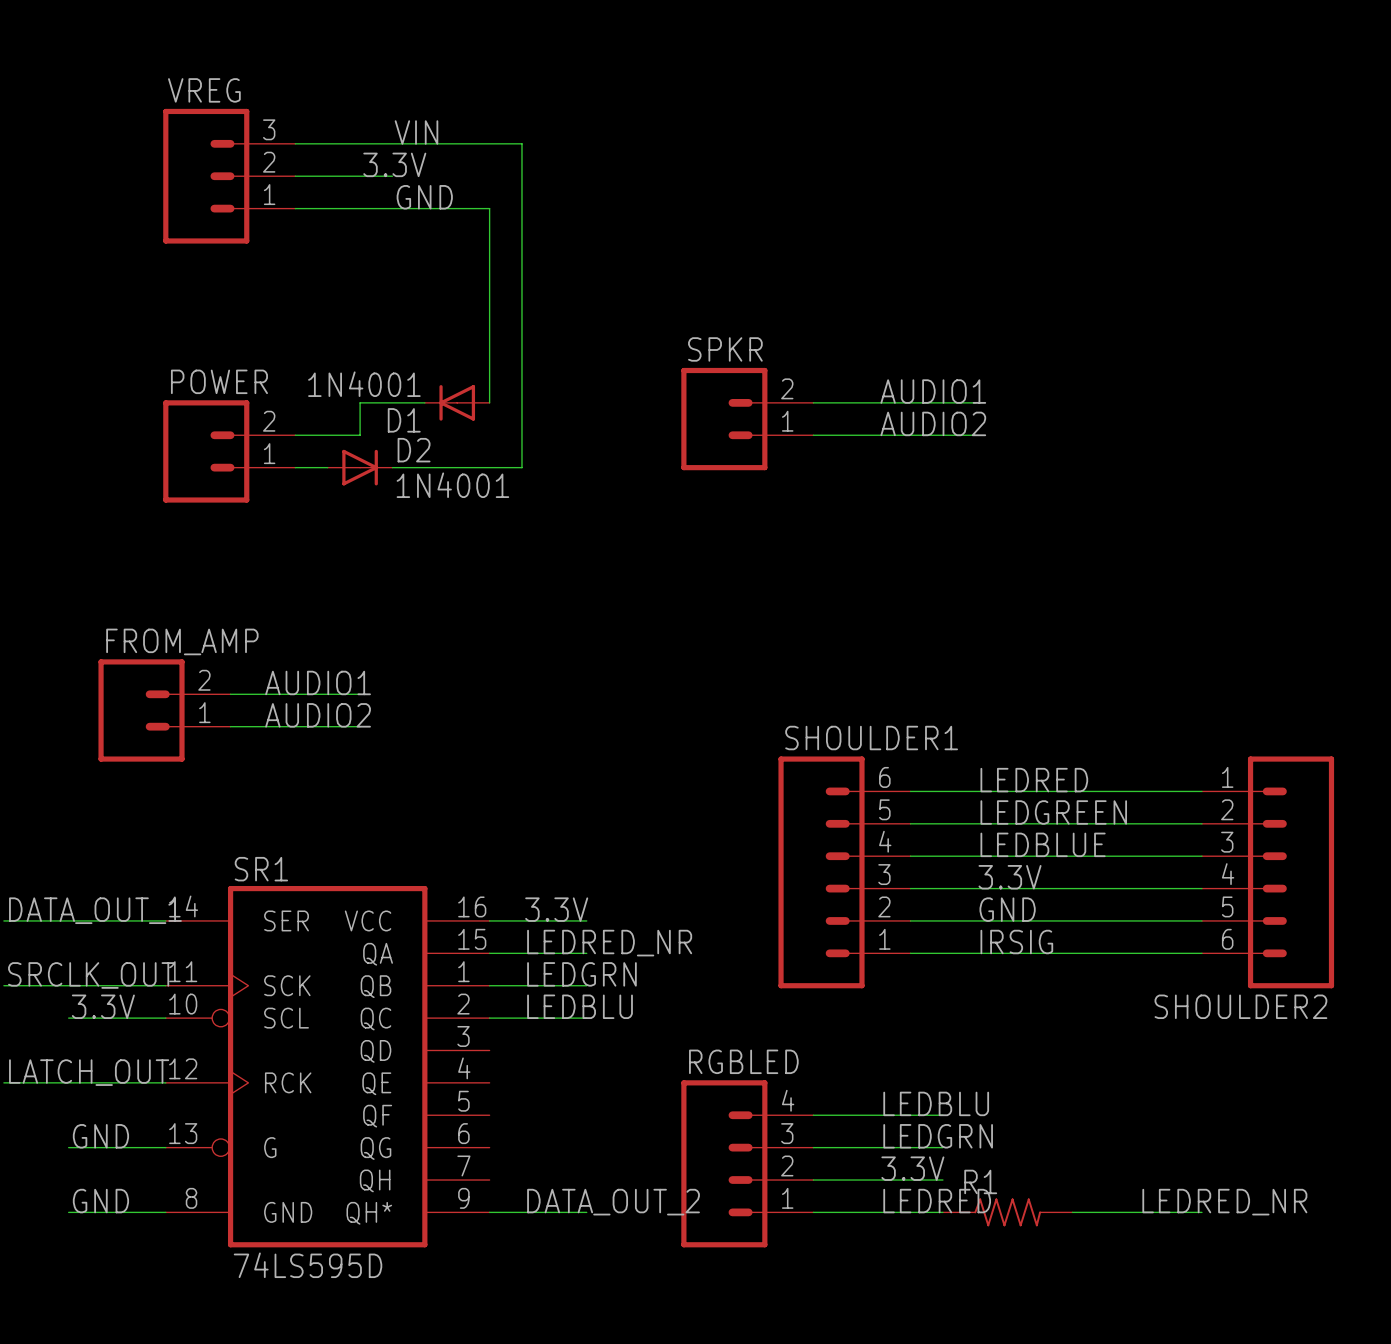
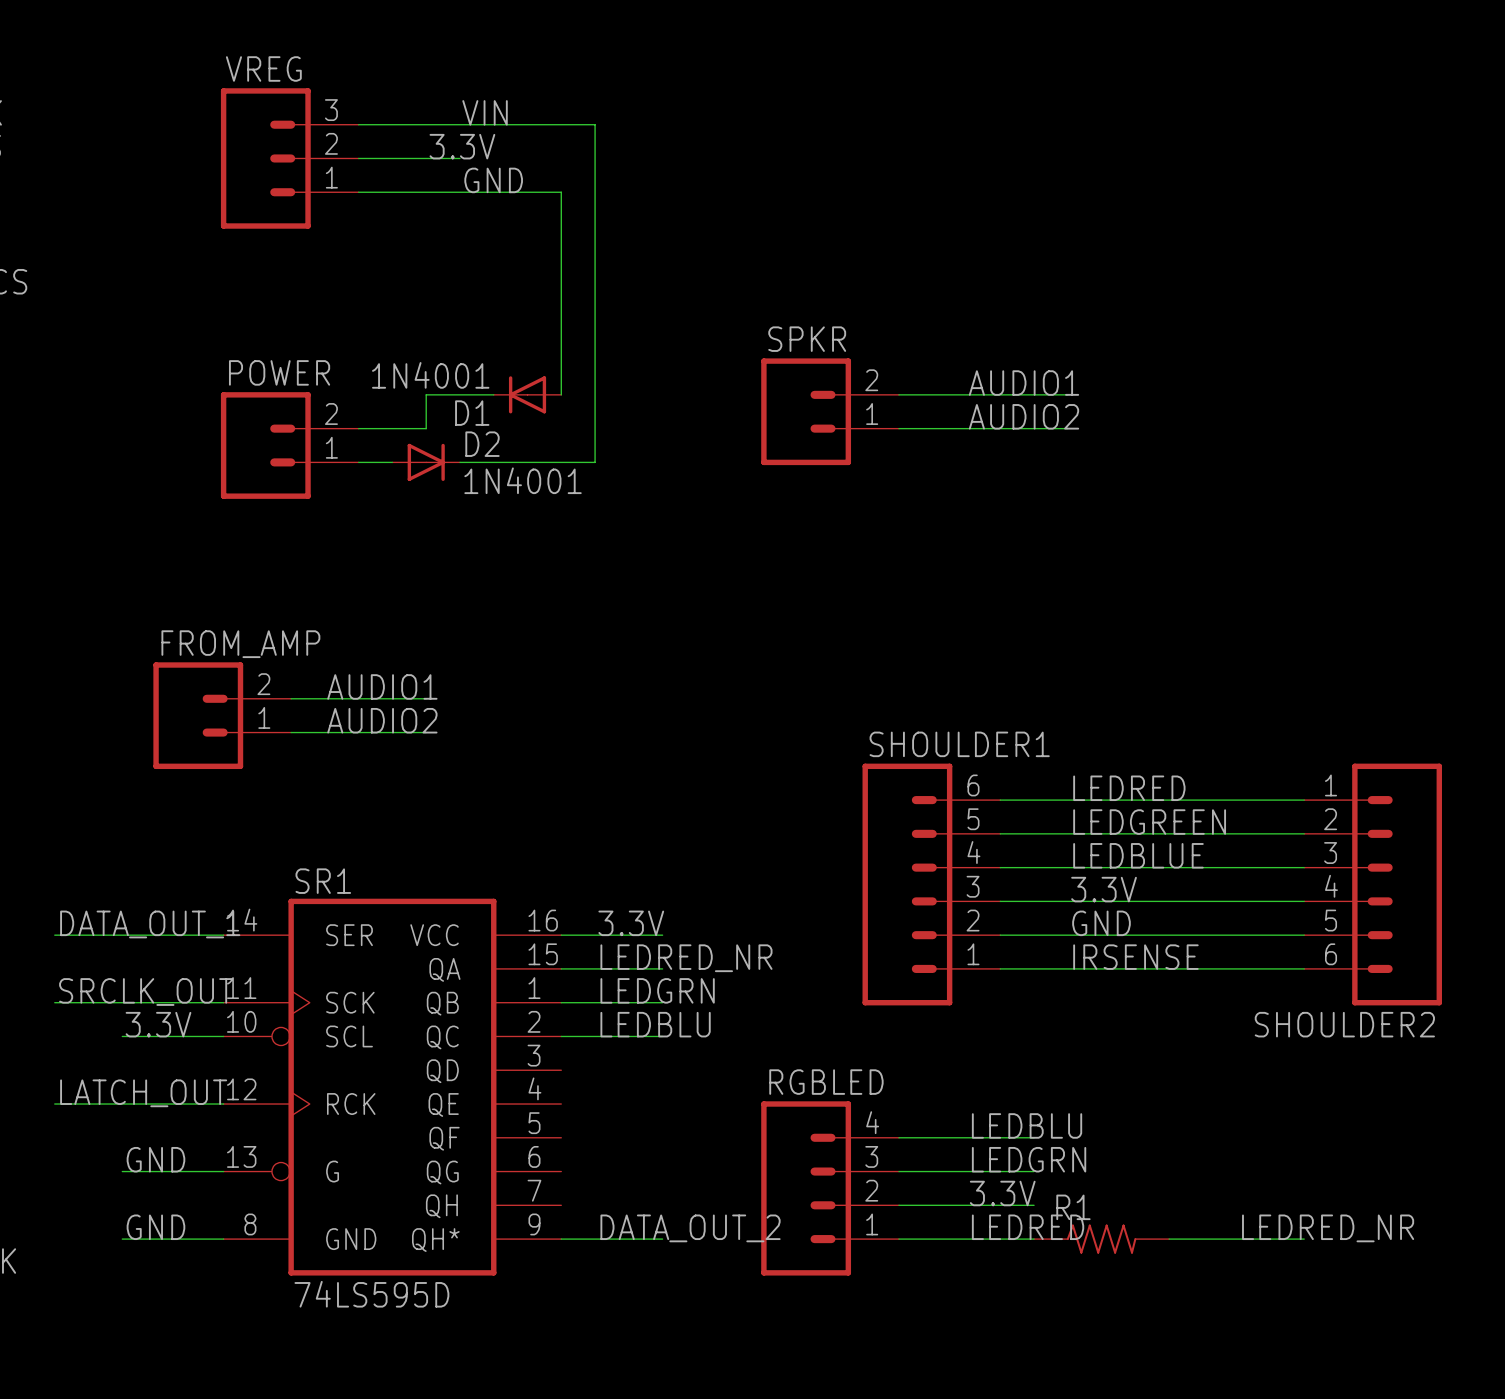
label: IRSIG (1016, 942) -> IRSENSE (1135, 957)

